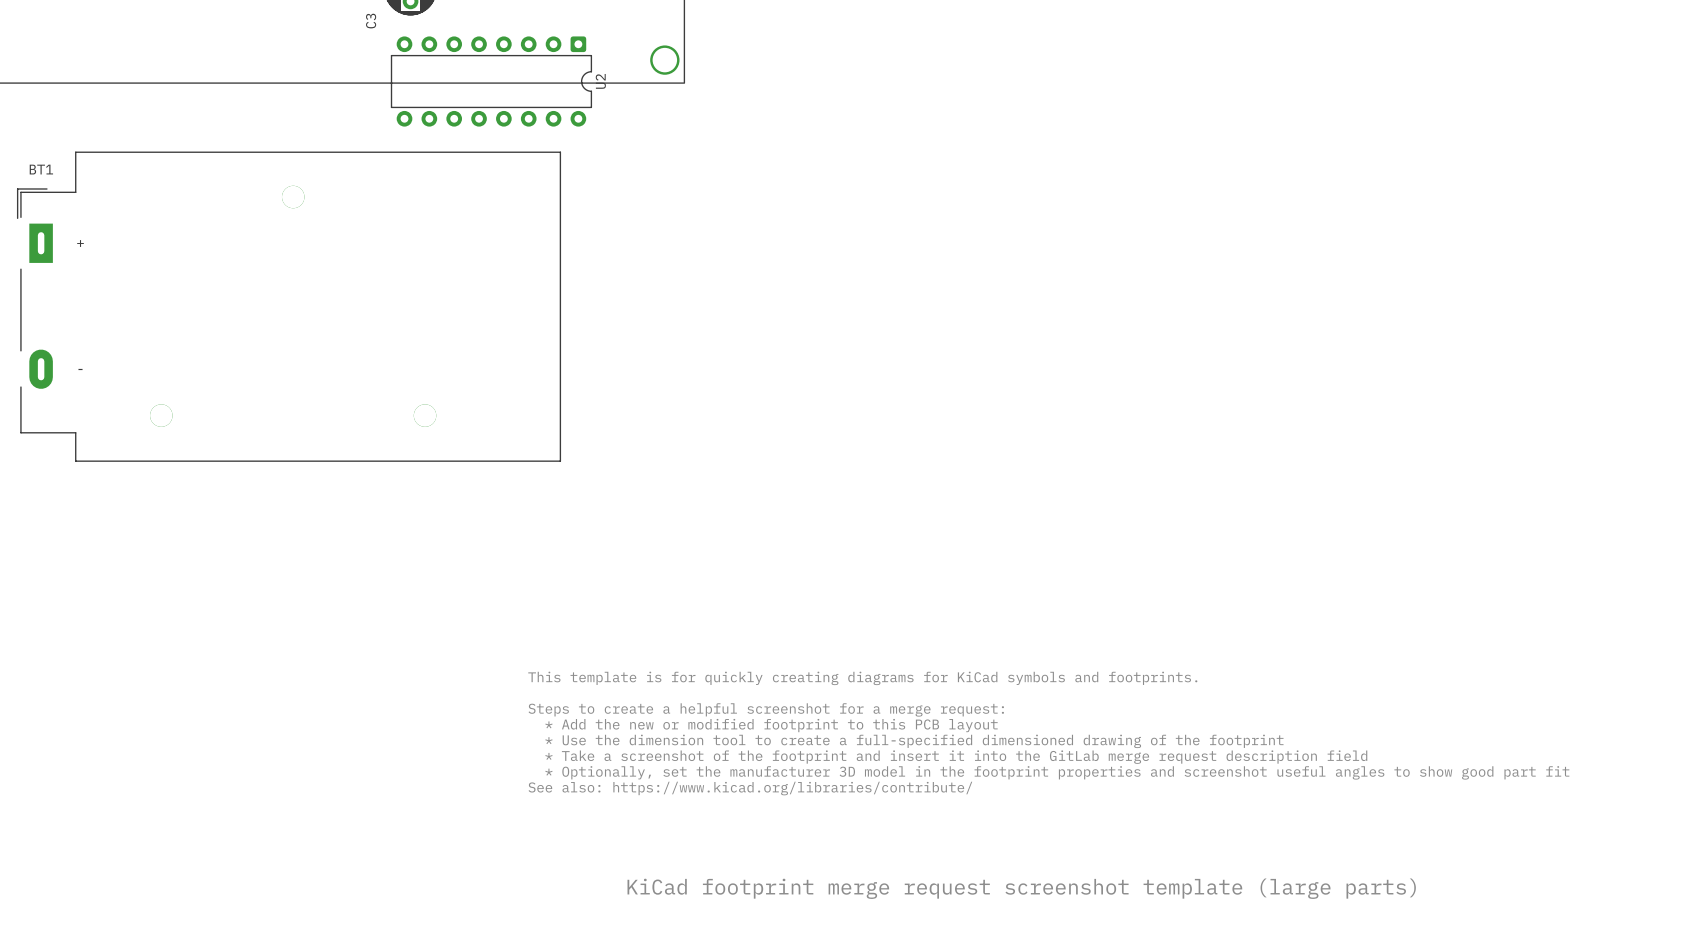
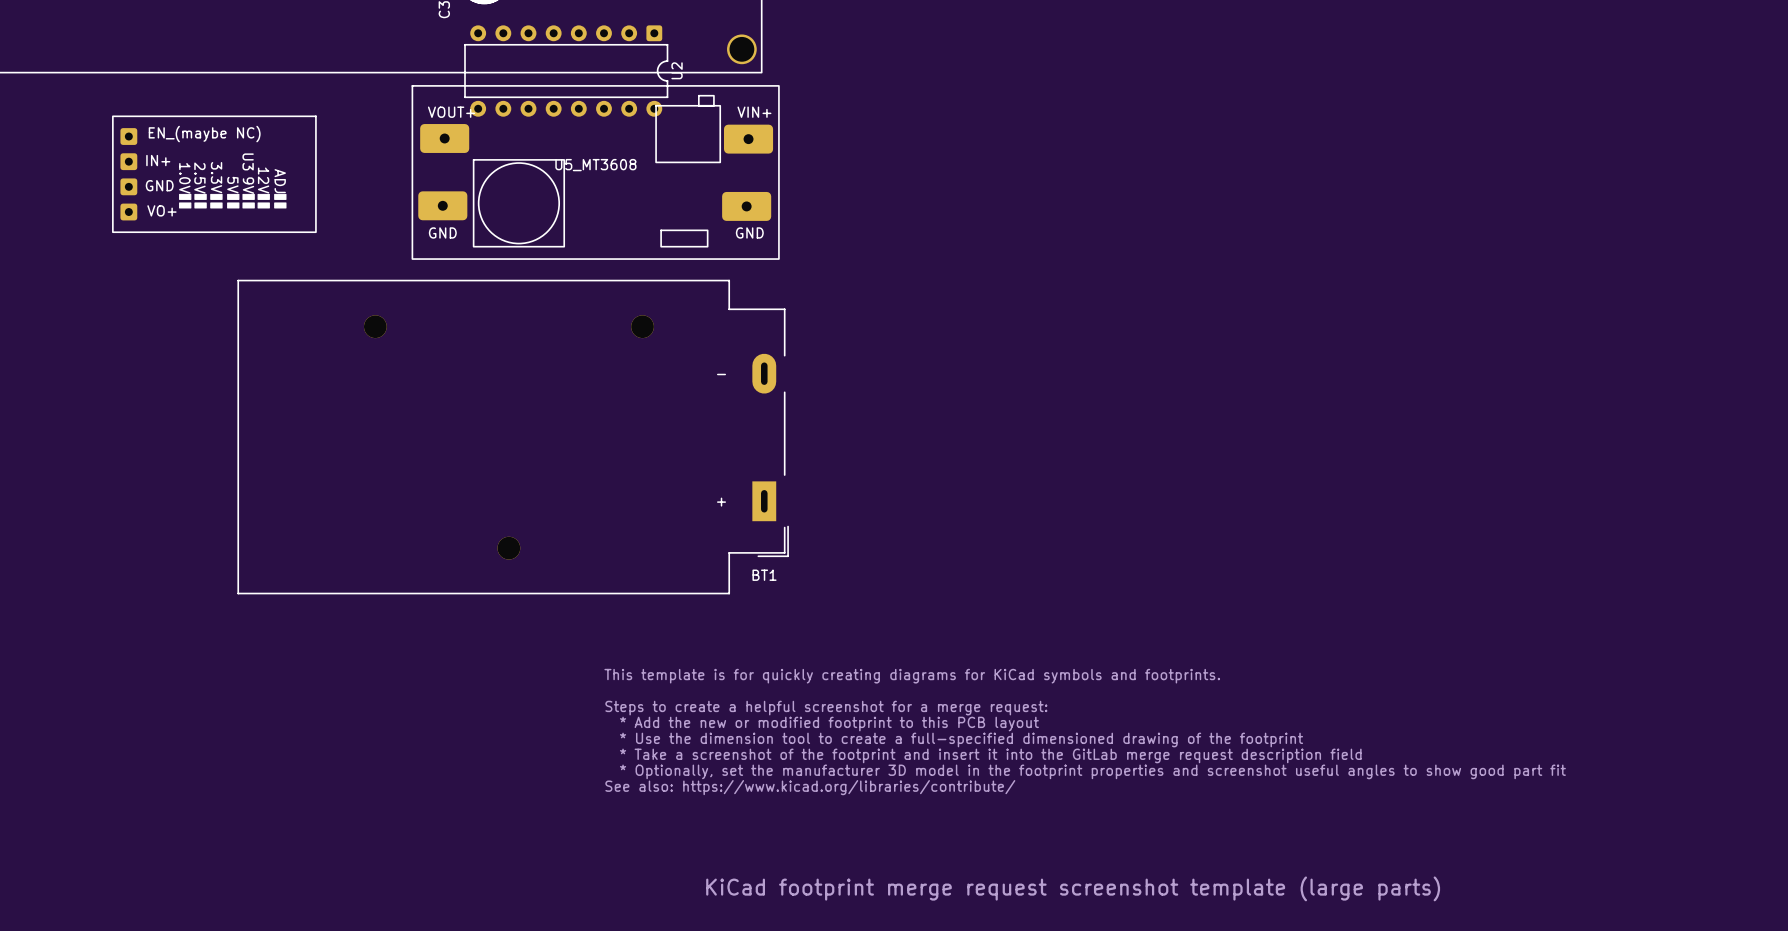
U5_MT3608: none -> (595, 172)
U3: none -> (214, 174)
BT1 rotation: 0° (289, 306) -> 180° (513, 437)

